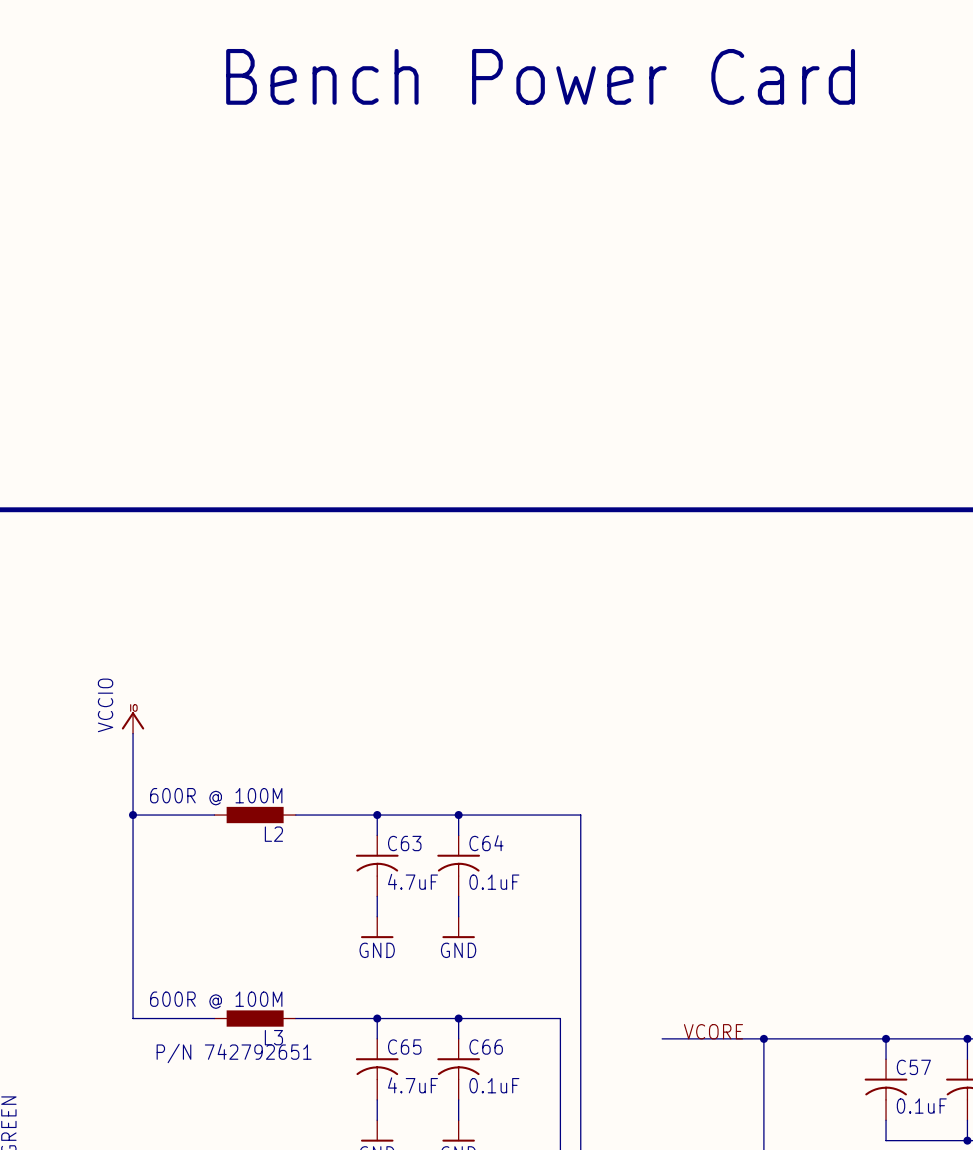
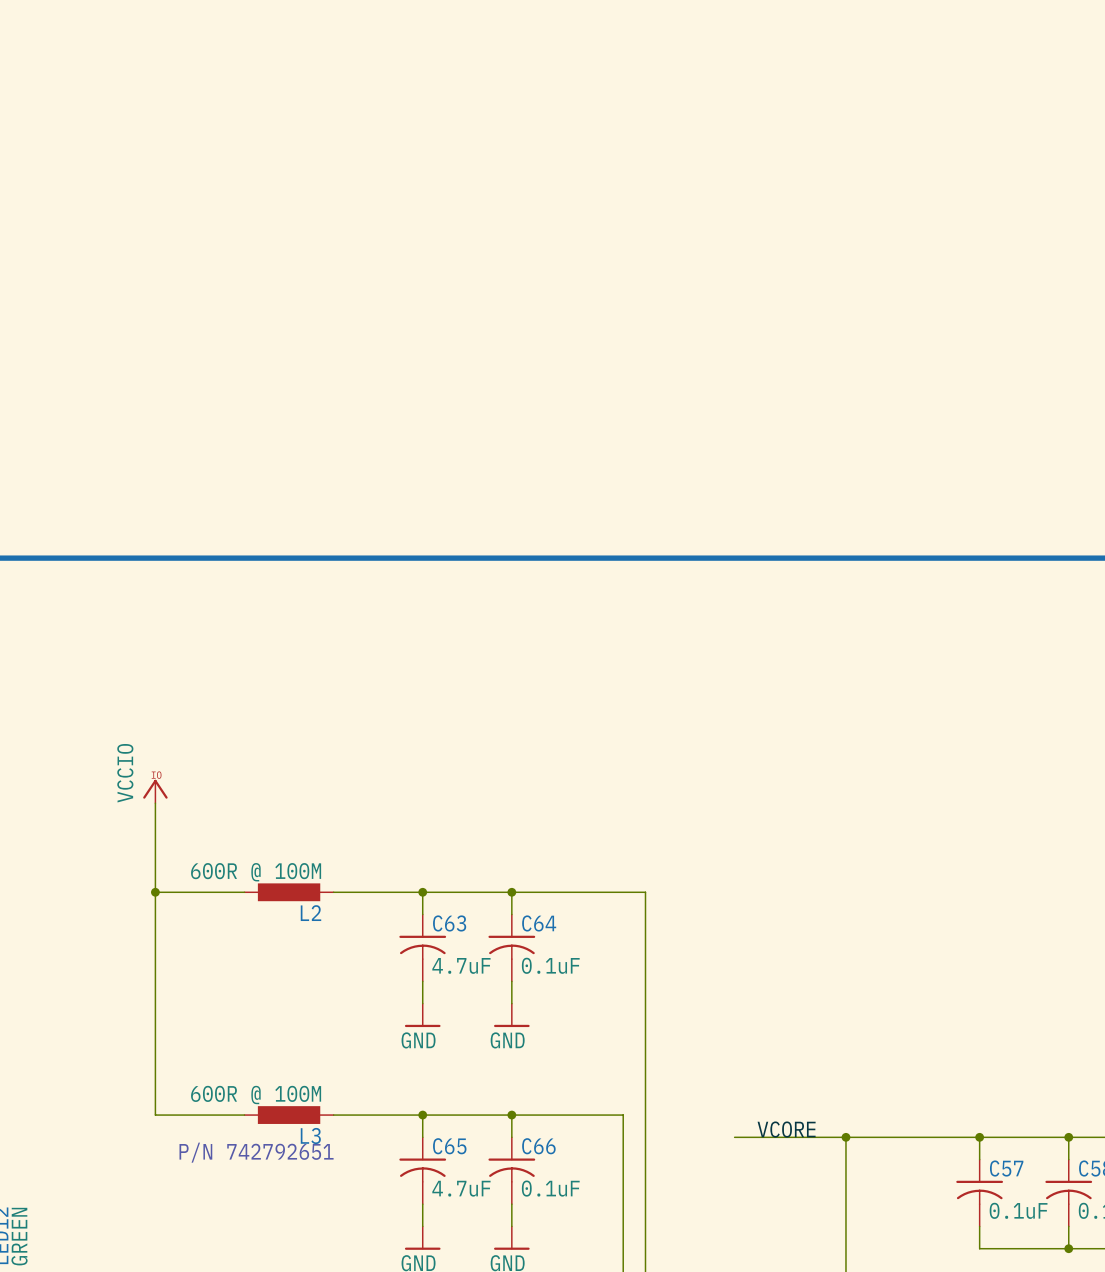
text: Bench Power Card (540, 76) -> none

